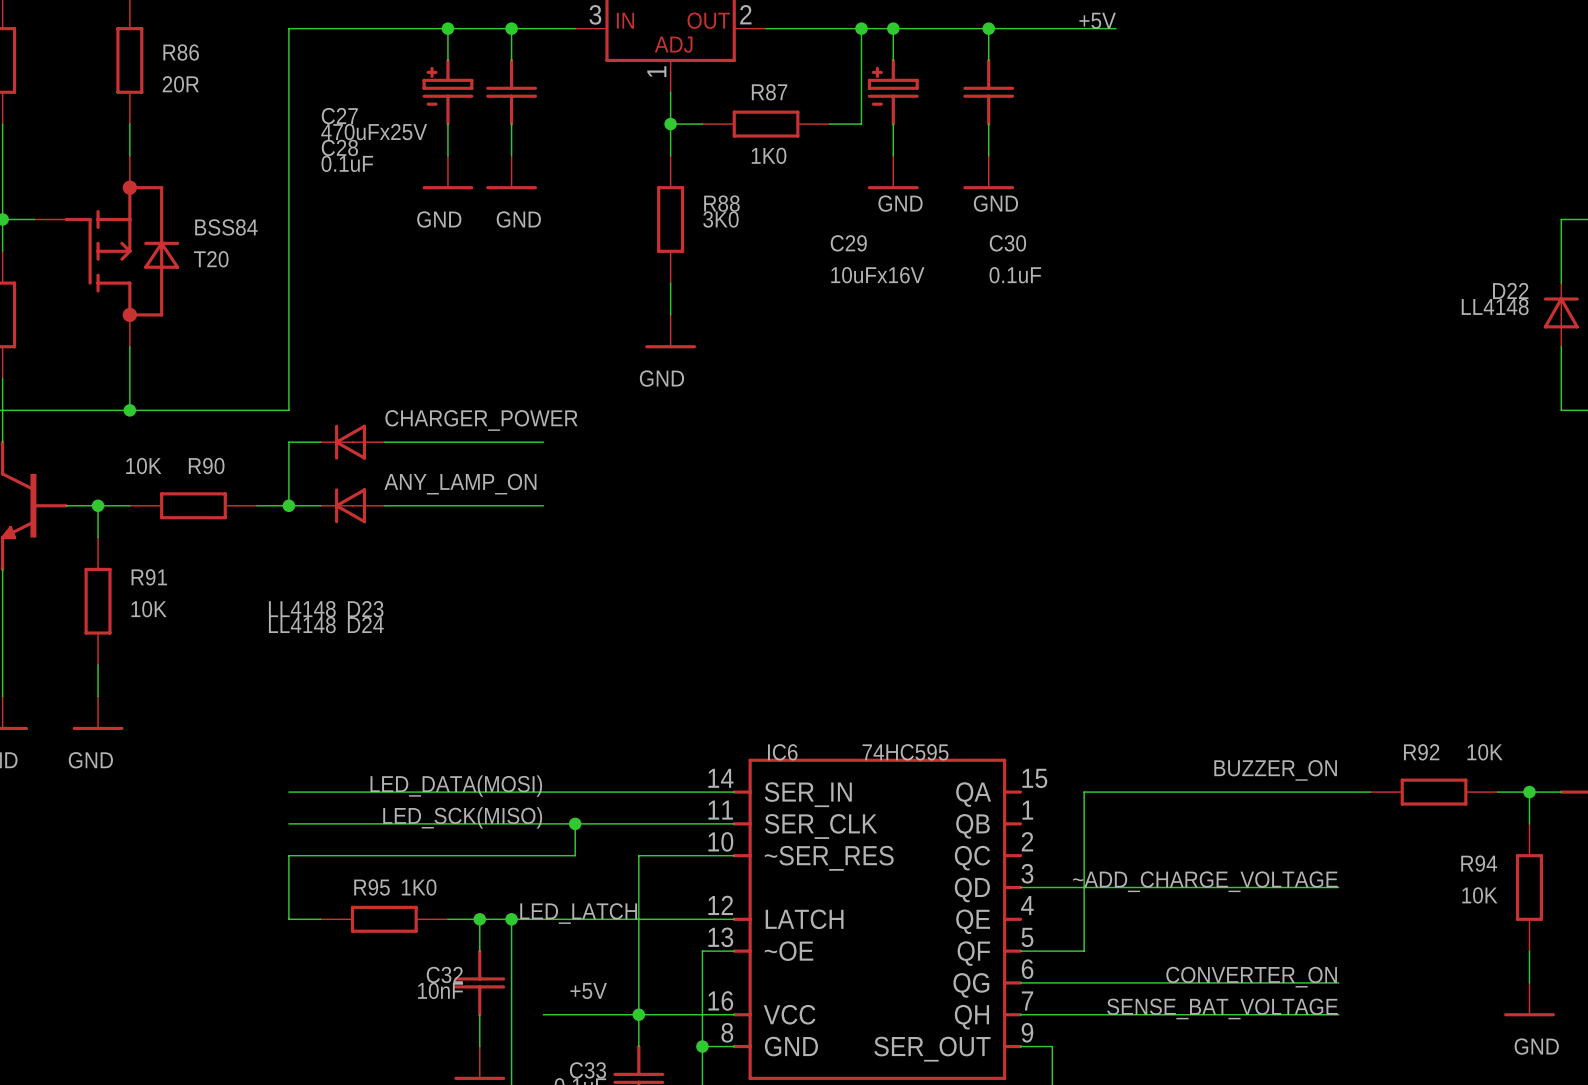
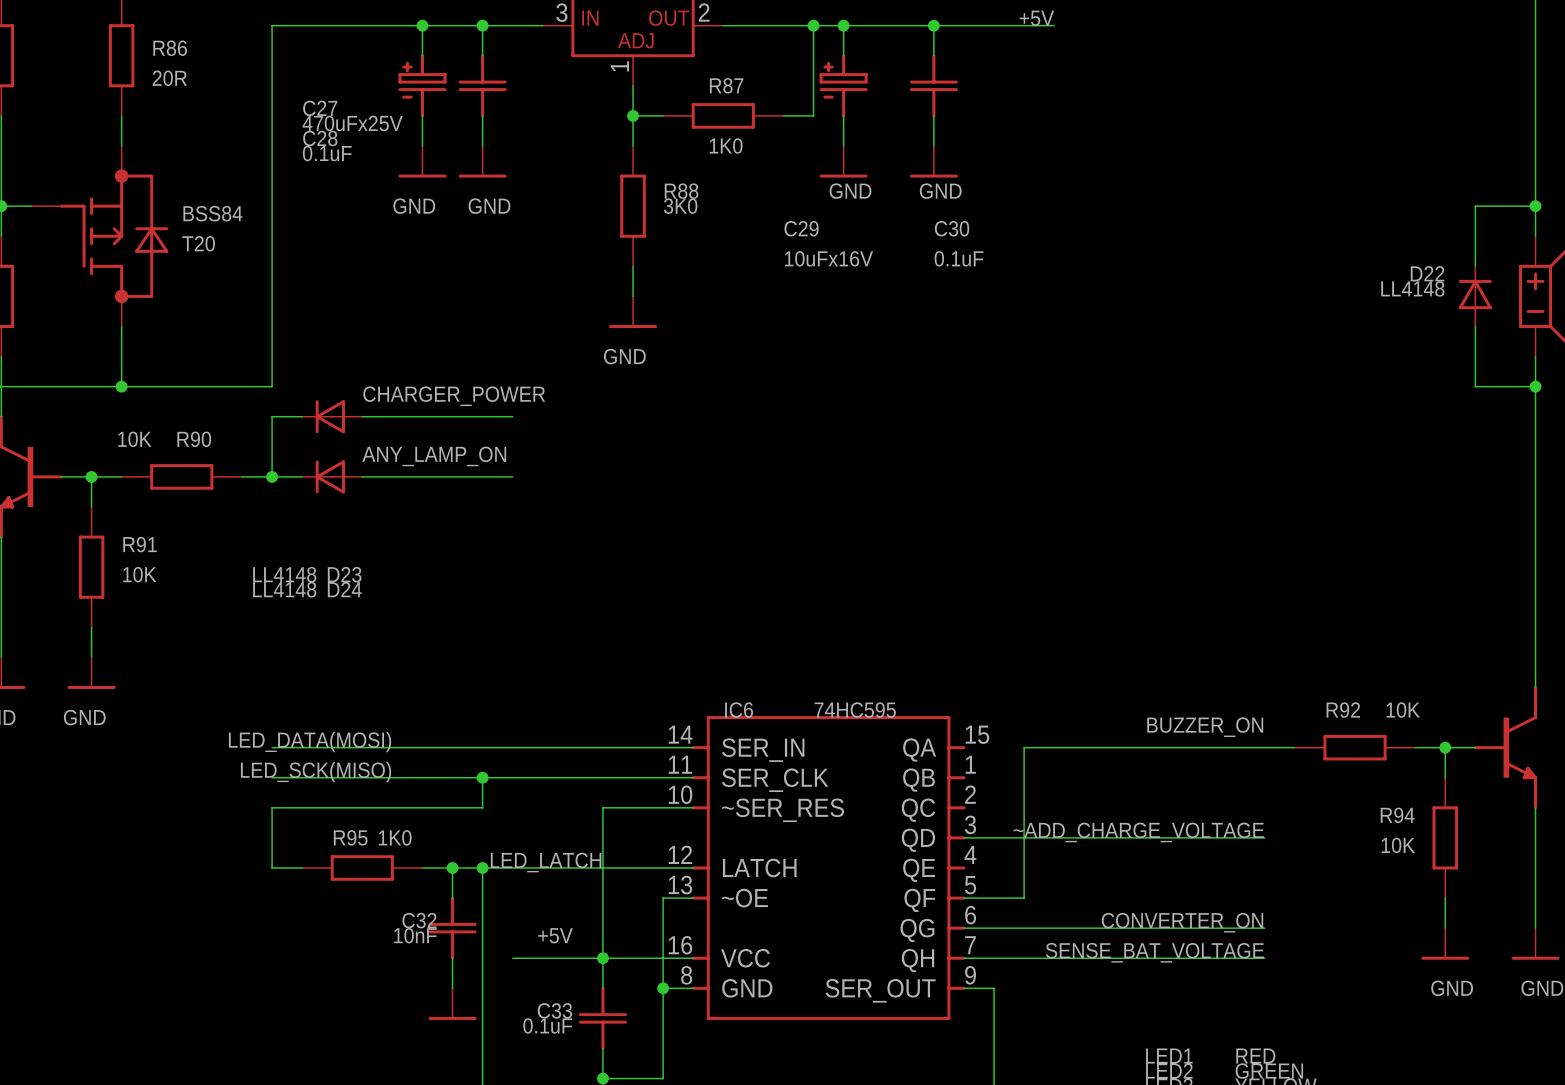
label position: LED_DATA(MOSI) (456, 786) -> LED_DATA(MOSI) (310, 742)
label position: LED_SCK(MISO) (462, 817) -> LED_SCK(MISO) (316, 772)
wire: (575, 823) (575, 855) (511, 855) -> (482, 777) (482, 807)
junction position: (575, 823) -> (482, 777)

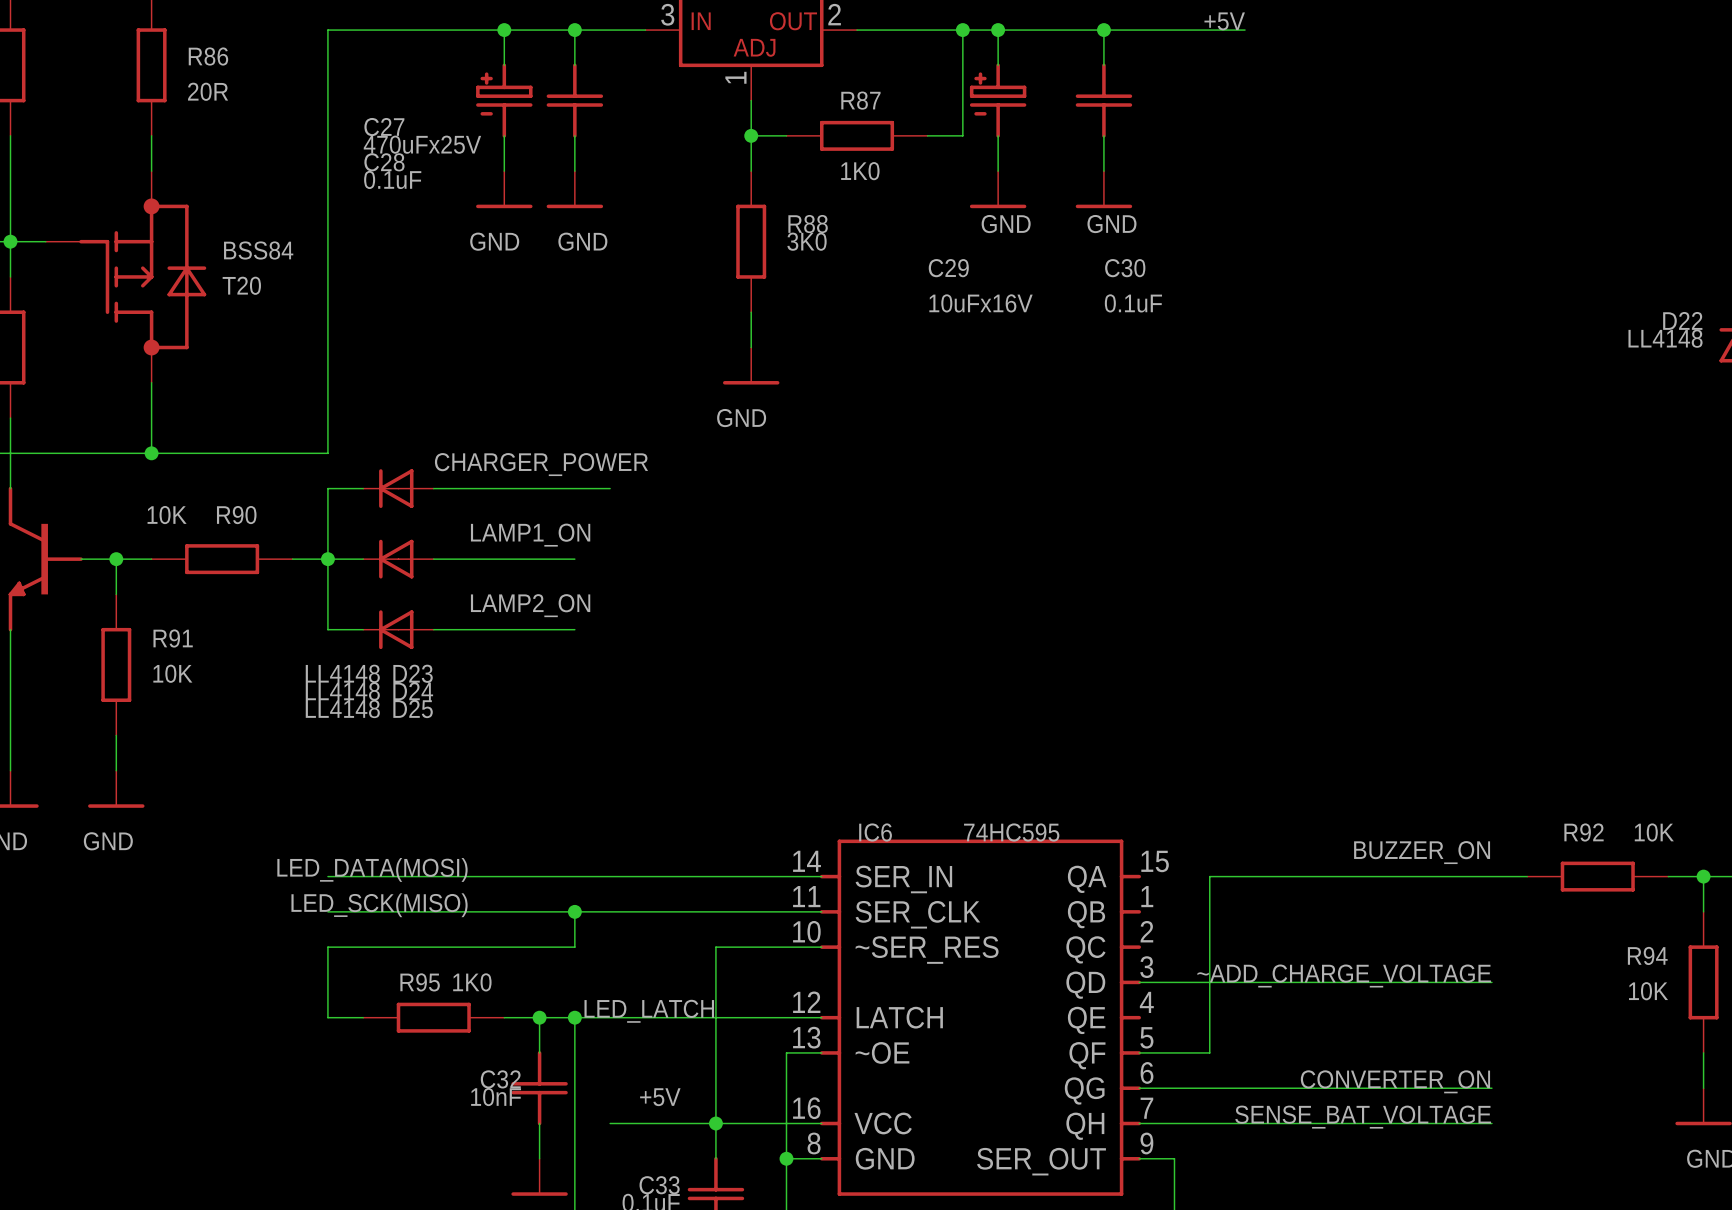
label: ANY_LAMP_ON (434, 456) -> LAMP1_ON (530, 535)
wire: none -> (327, 559) (327, 629) (363, 629)
wire: (482, 476) (512, 476) -> none
label: none -> LAMP2_ON (530, 605)
D25: none -> LL4148 (398, 629)
wire: none -> (433, 629) (574, 629)

